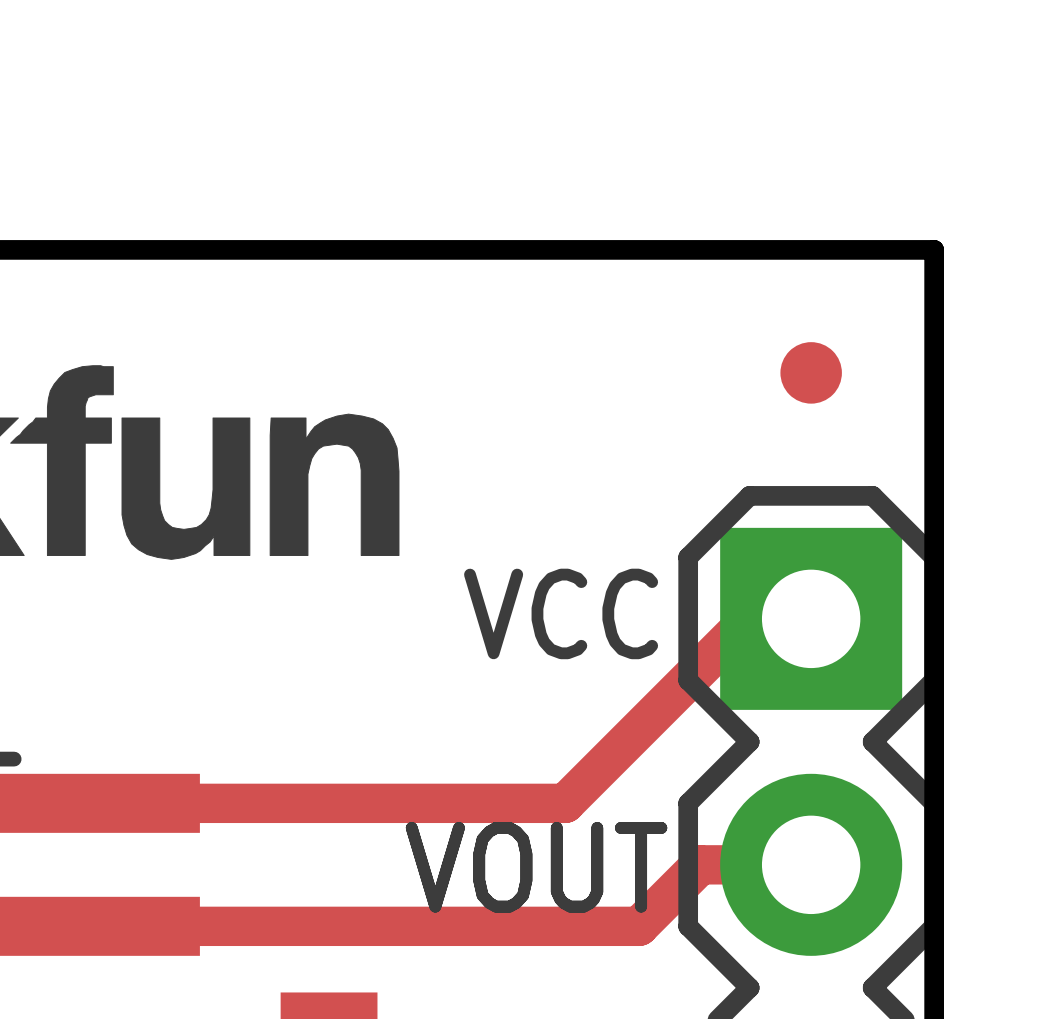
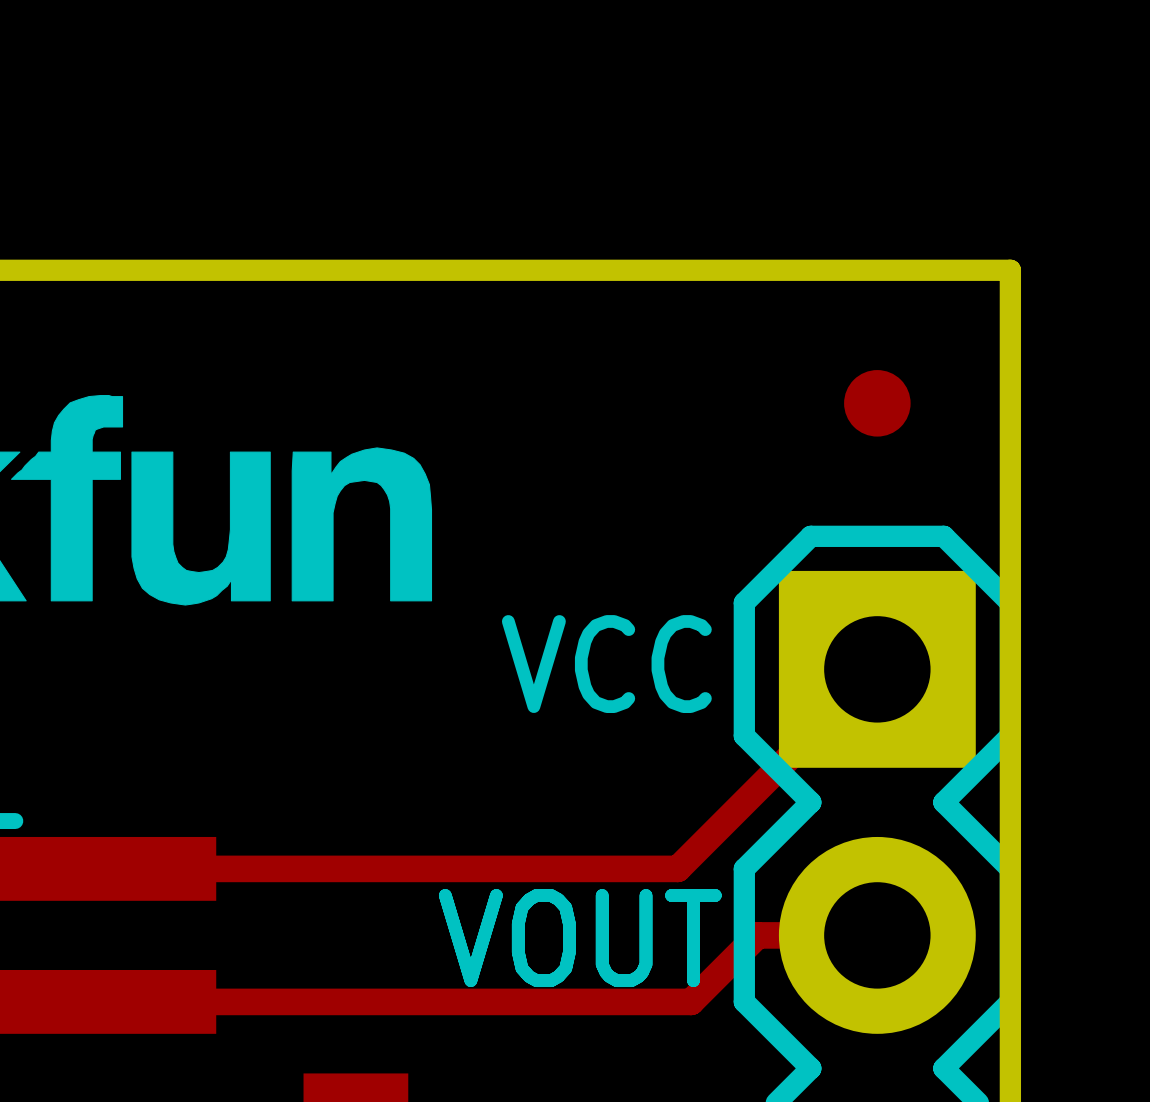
top track: (811, 618) (749, 618) (565, 803) -> (877, 669) (677, 868) (611, 868)
top track width: thick (92, 803) (565, 803) -> thin (100, 868) (611, 868)
top track width: thick (811, 864) (700, 864) (638, 926) (92, 926) -> thin (877, 935) (757, 935) (691, 1001) (100, 1001)

